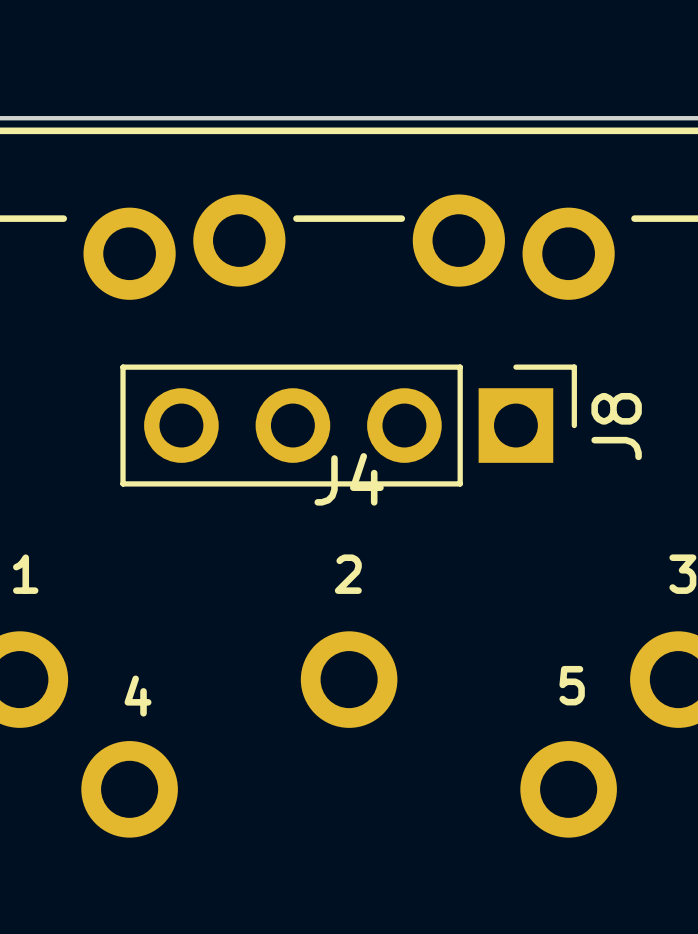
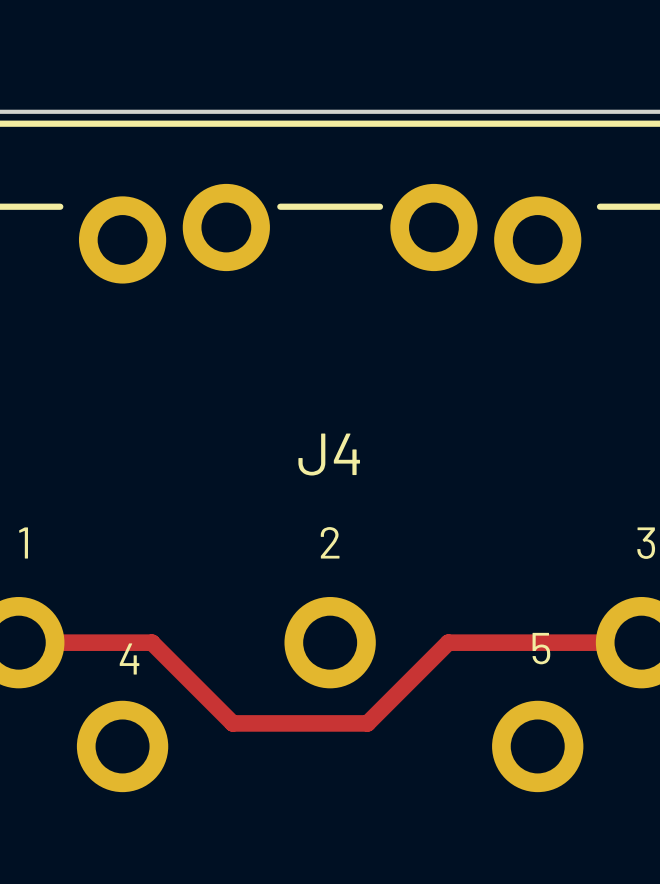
J8: (348, 425) -> none
track: none -> (18, 642) (151, 642) (232, 723) (367, 723) (448, 642) (641, 642)

